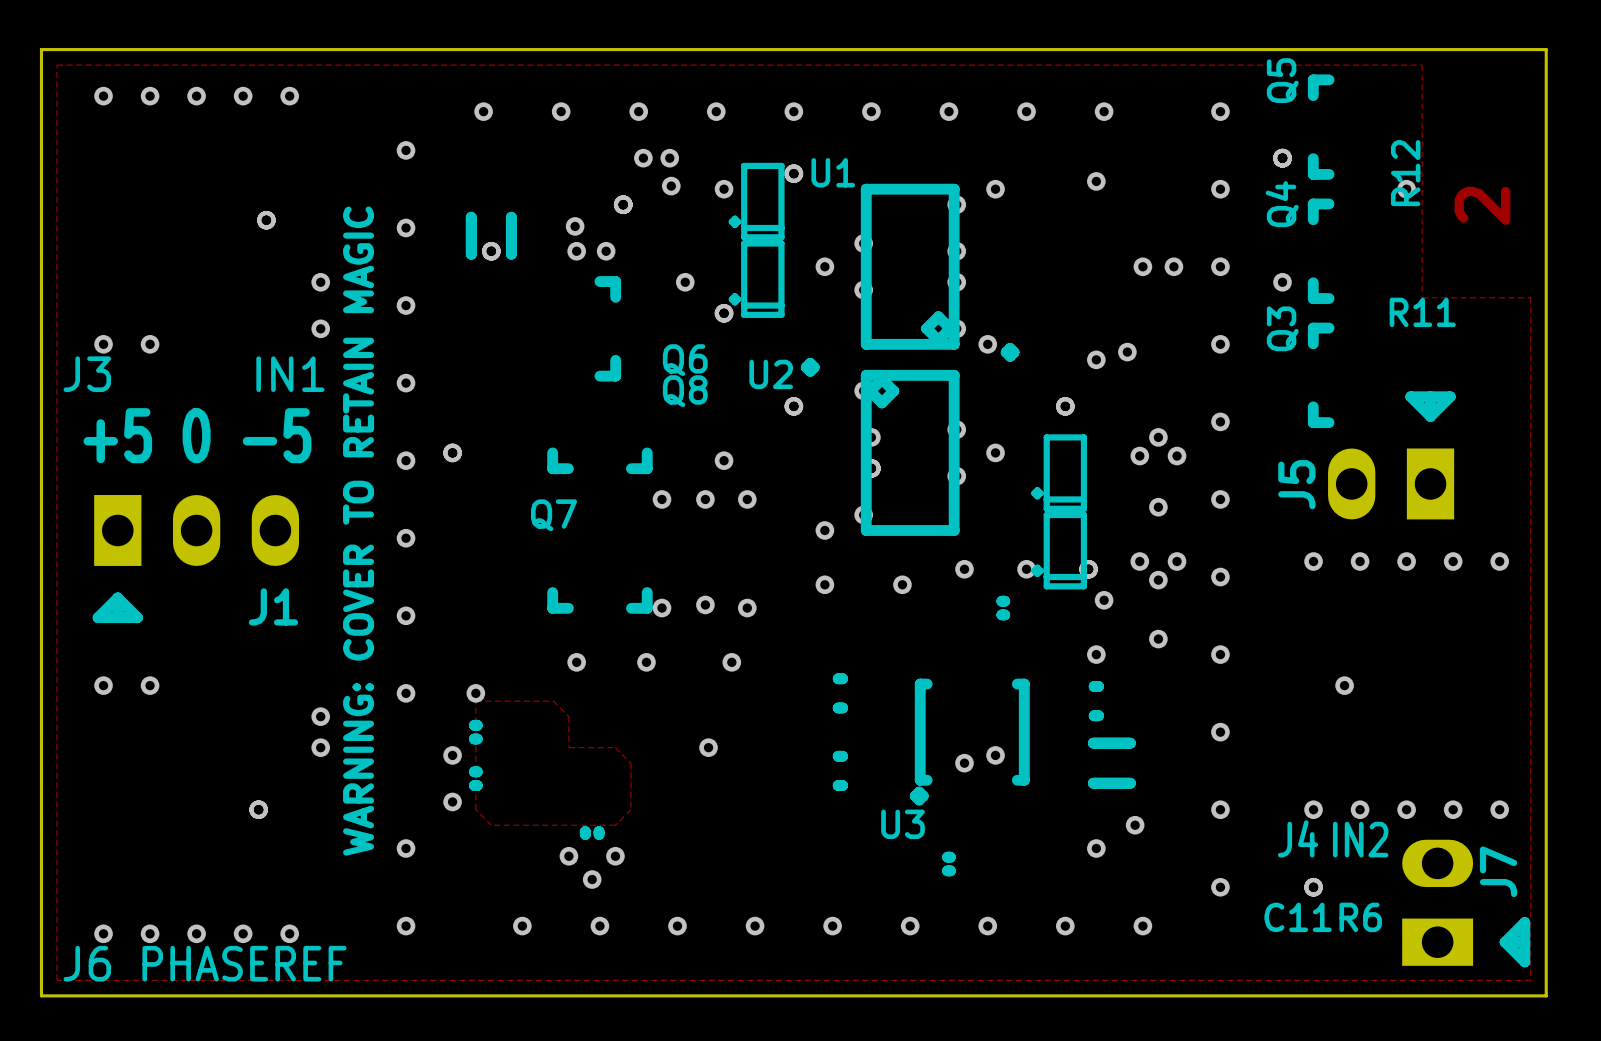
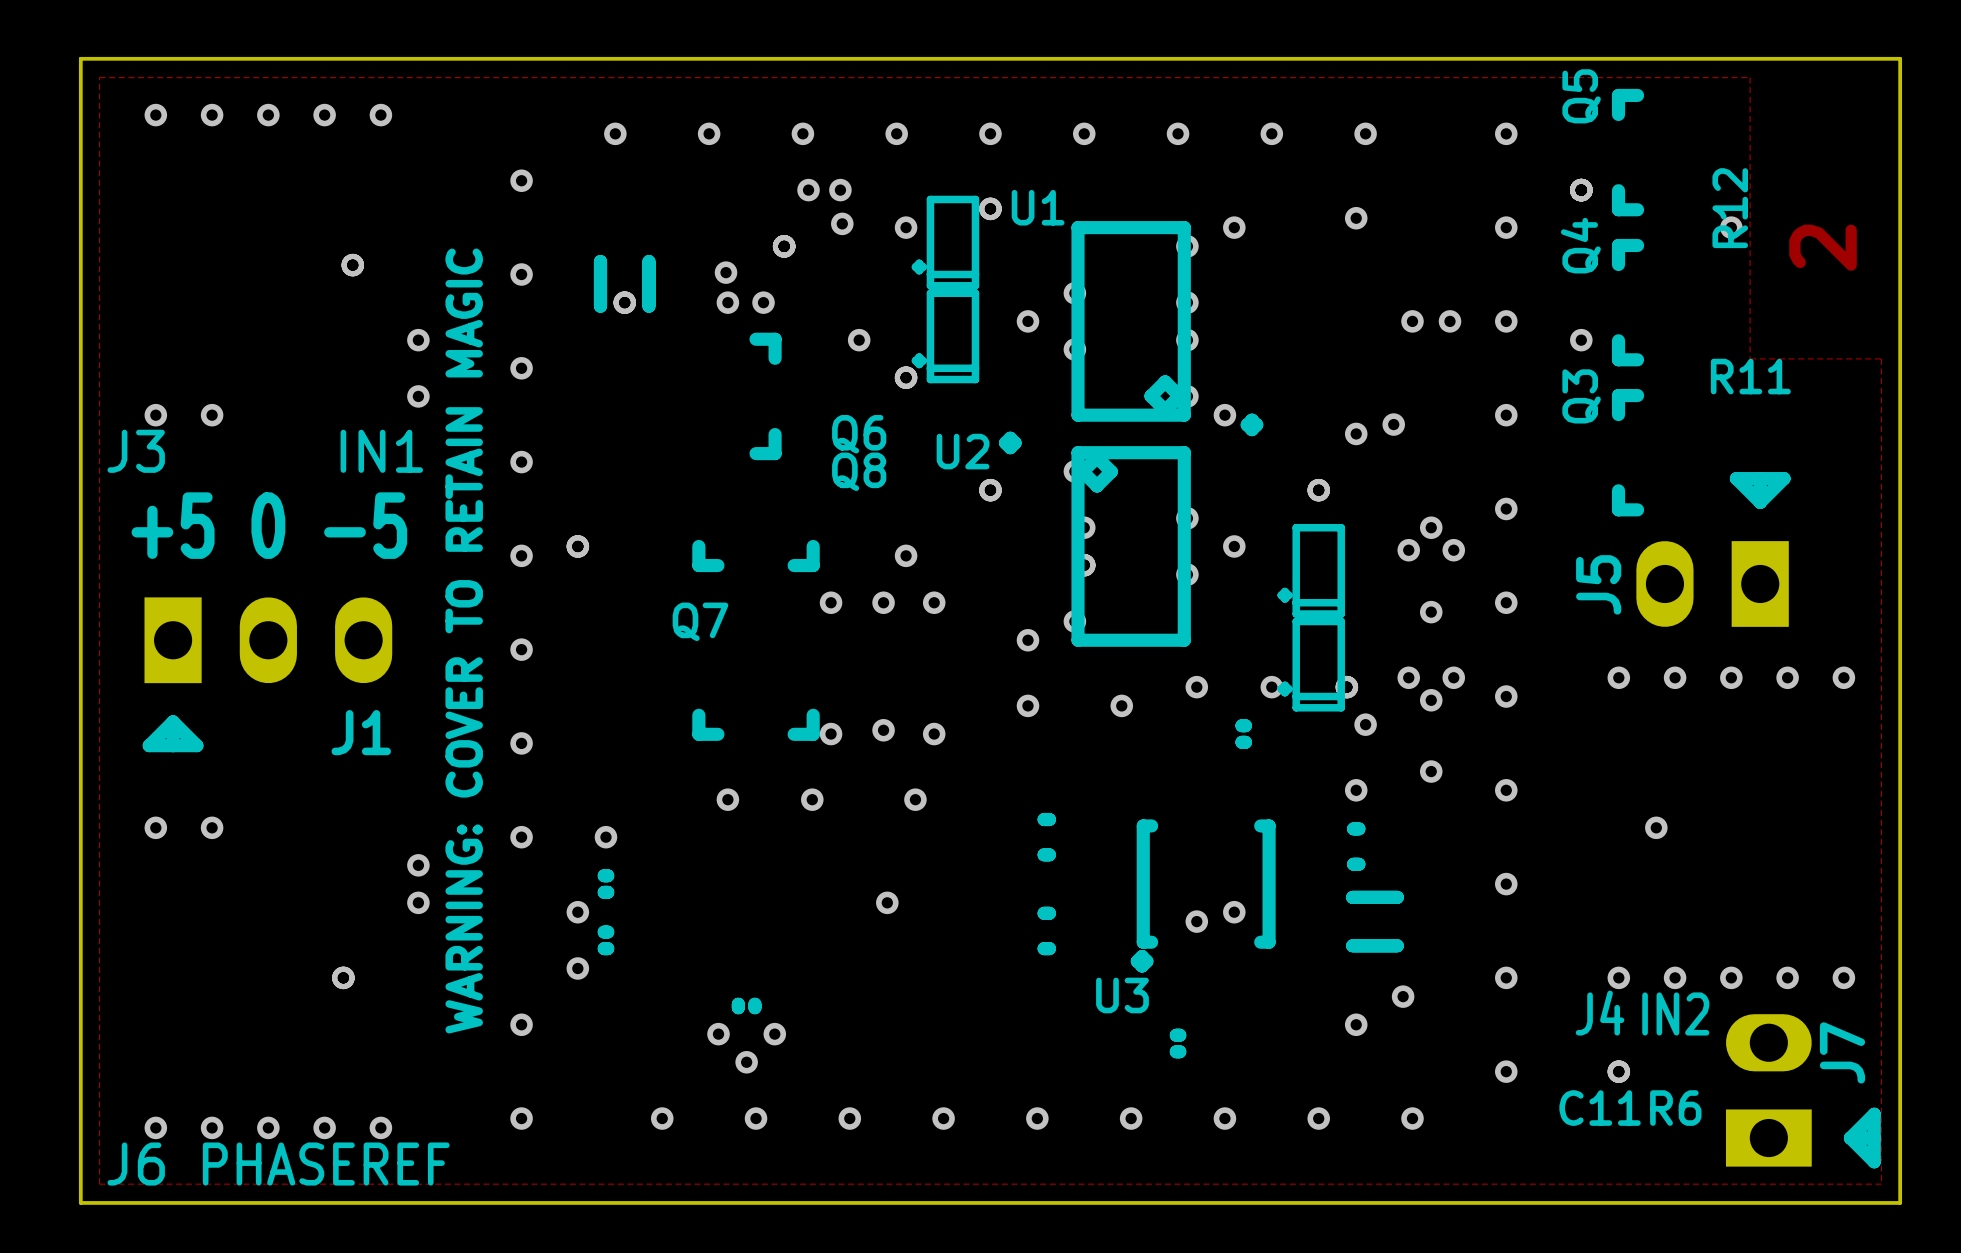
zone outline: (475, 701) (553, 701) (568, 716) (568, 747) (615, 747) (630, 763) (630, 809) (615, 825) (491, 825) (475, 809) (475, 701) -> none

